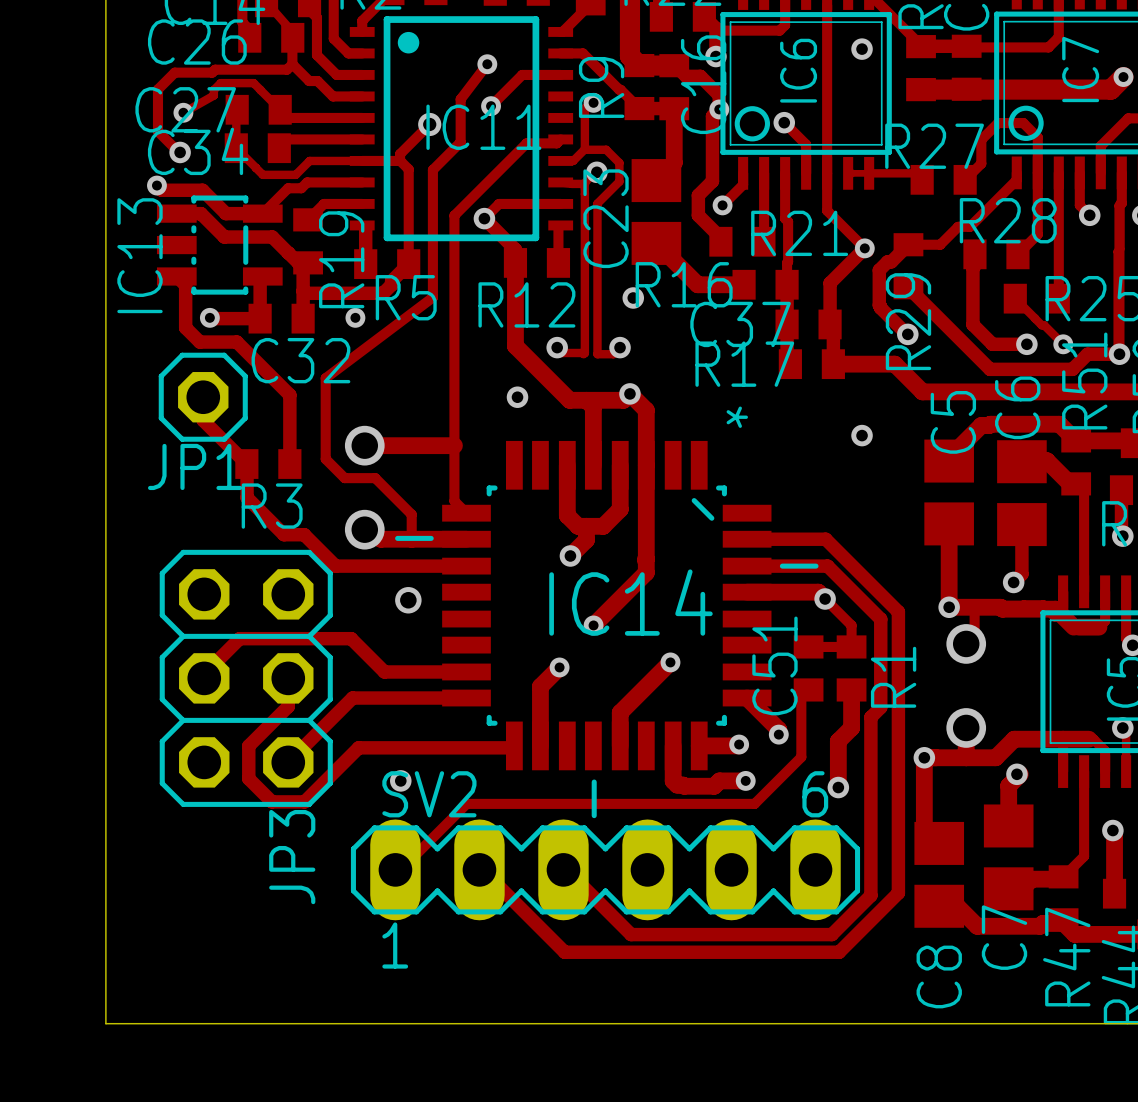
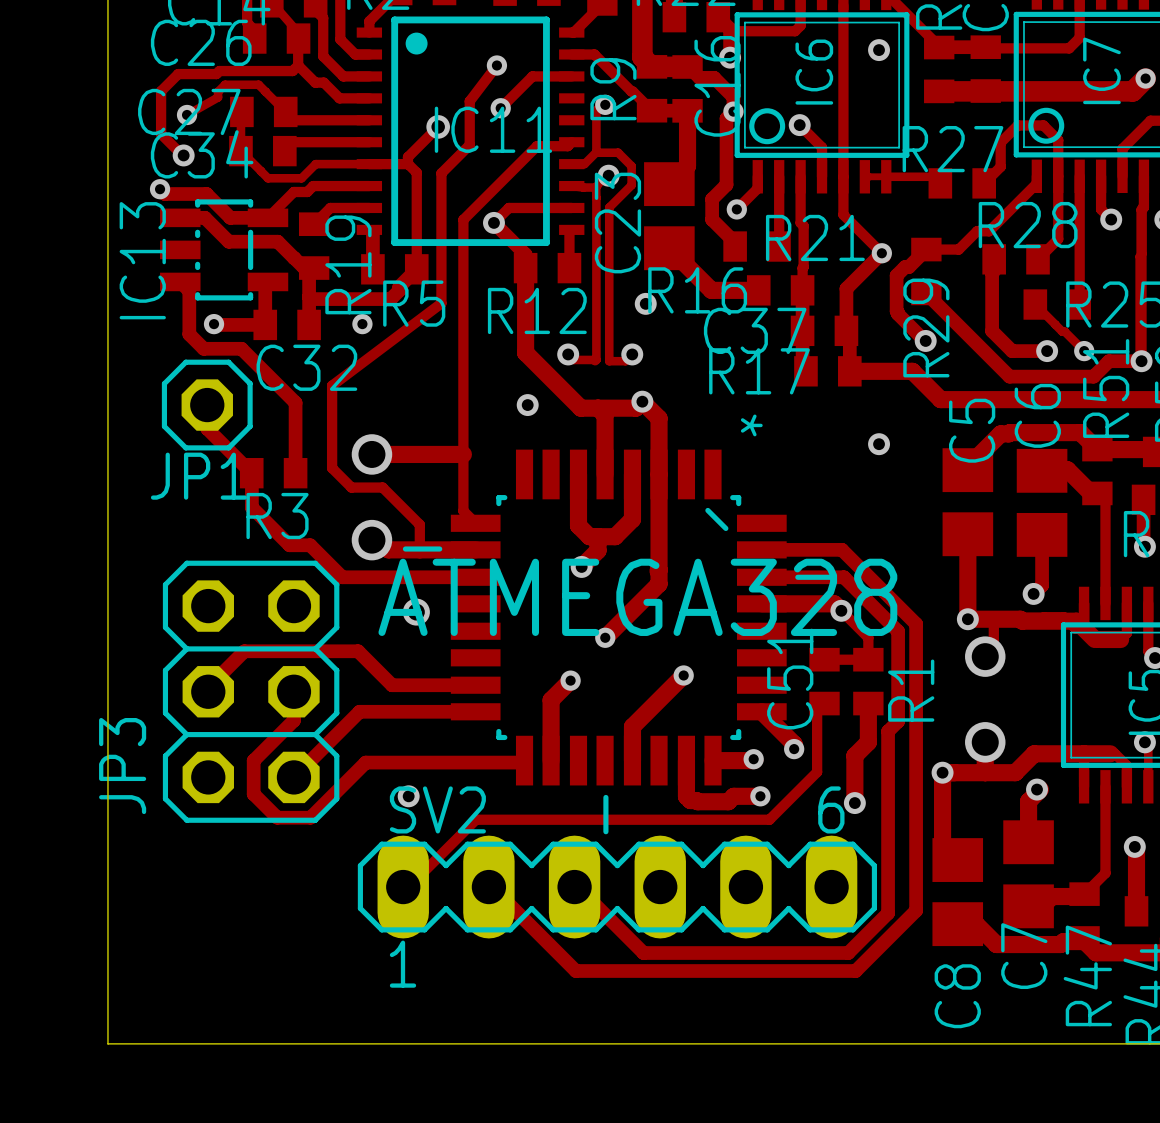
ATMEGA328 name: none -> ATMEGA328 (637, 597)
text: IC14 (630, 602) -> none
JP3 name position: JP3 (292, 857) -> JP3 (122, 766)

